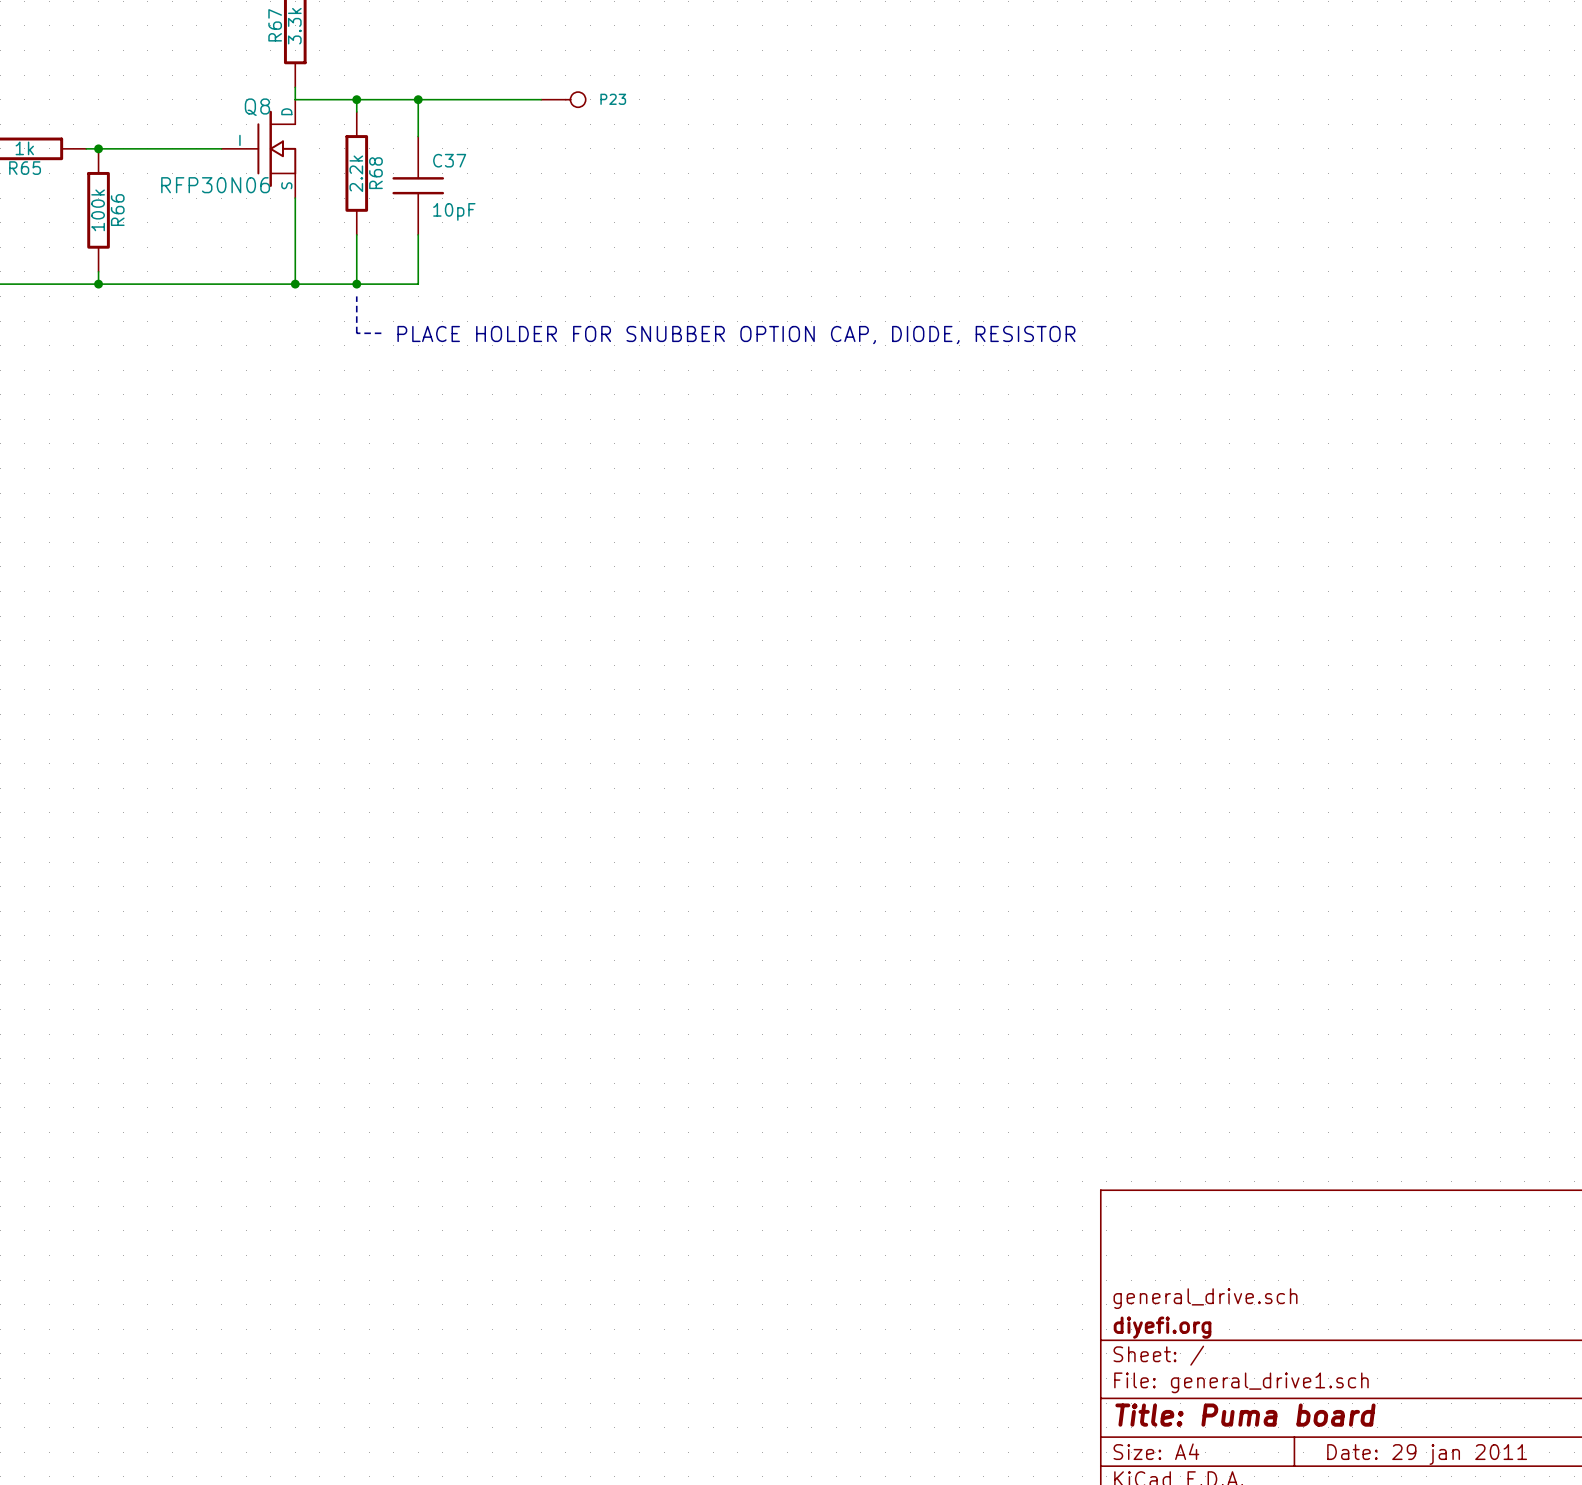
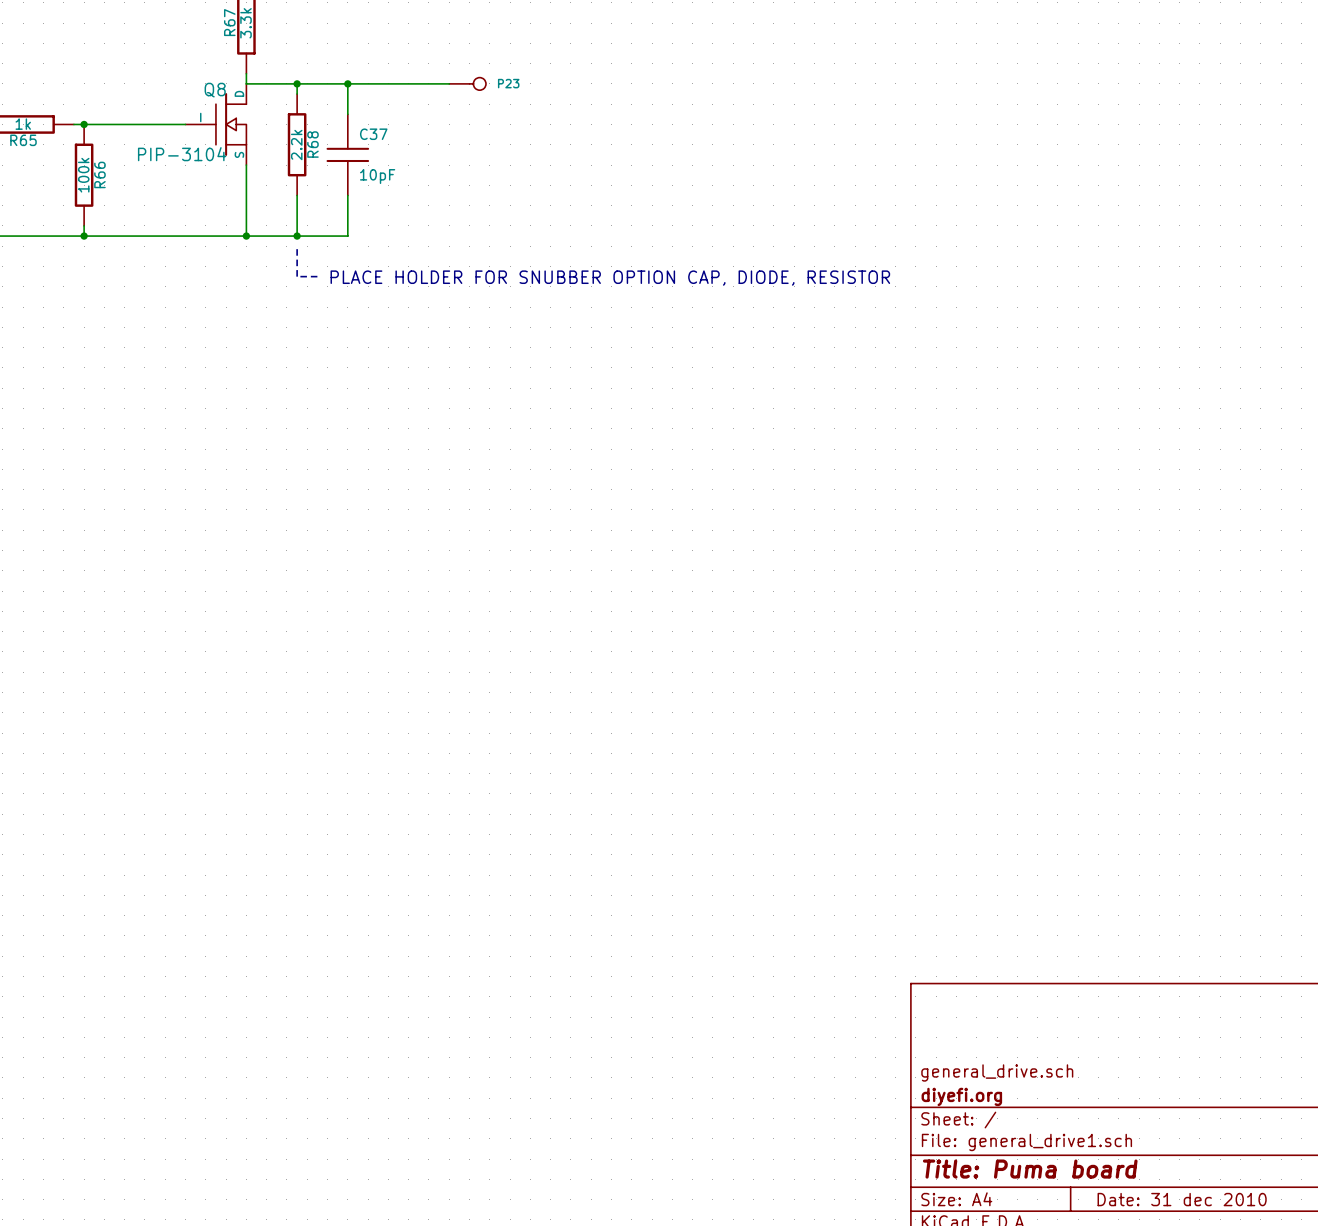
Q8 value: RFP30N06 (215, 185) -> PIP-3104 (182, 154)
title block: Date: 29 jan 2011 (1427, 1454) -> Date: 31 dec 2010 (1182, 1199)

